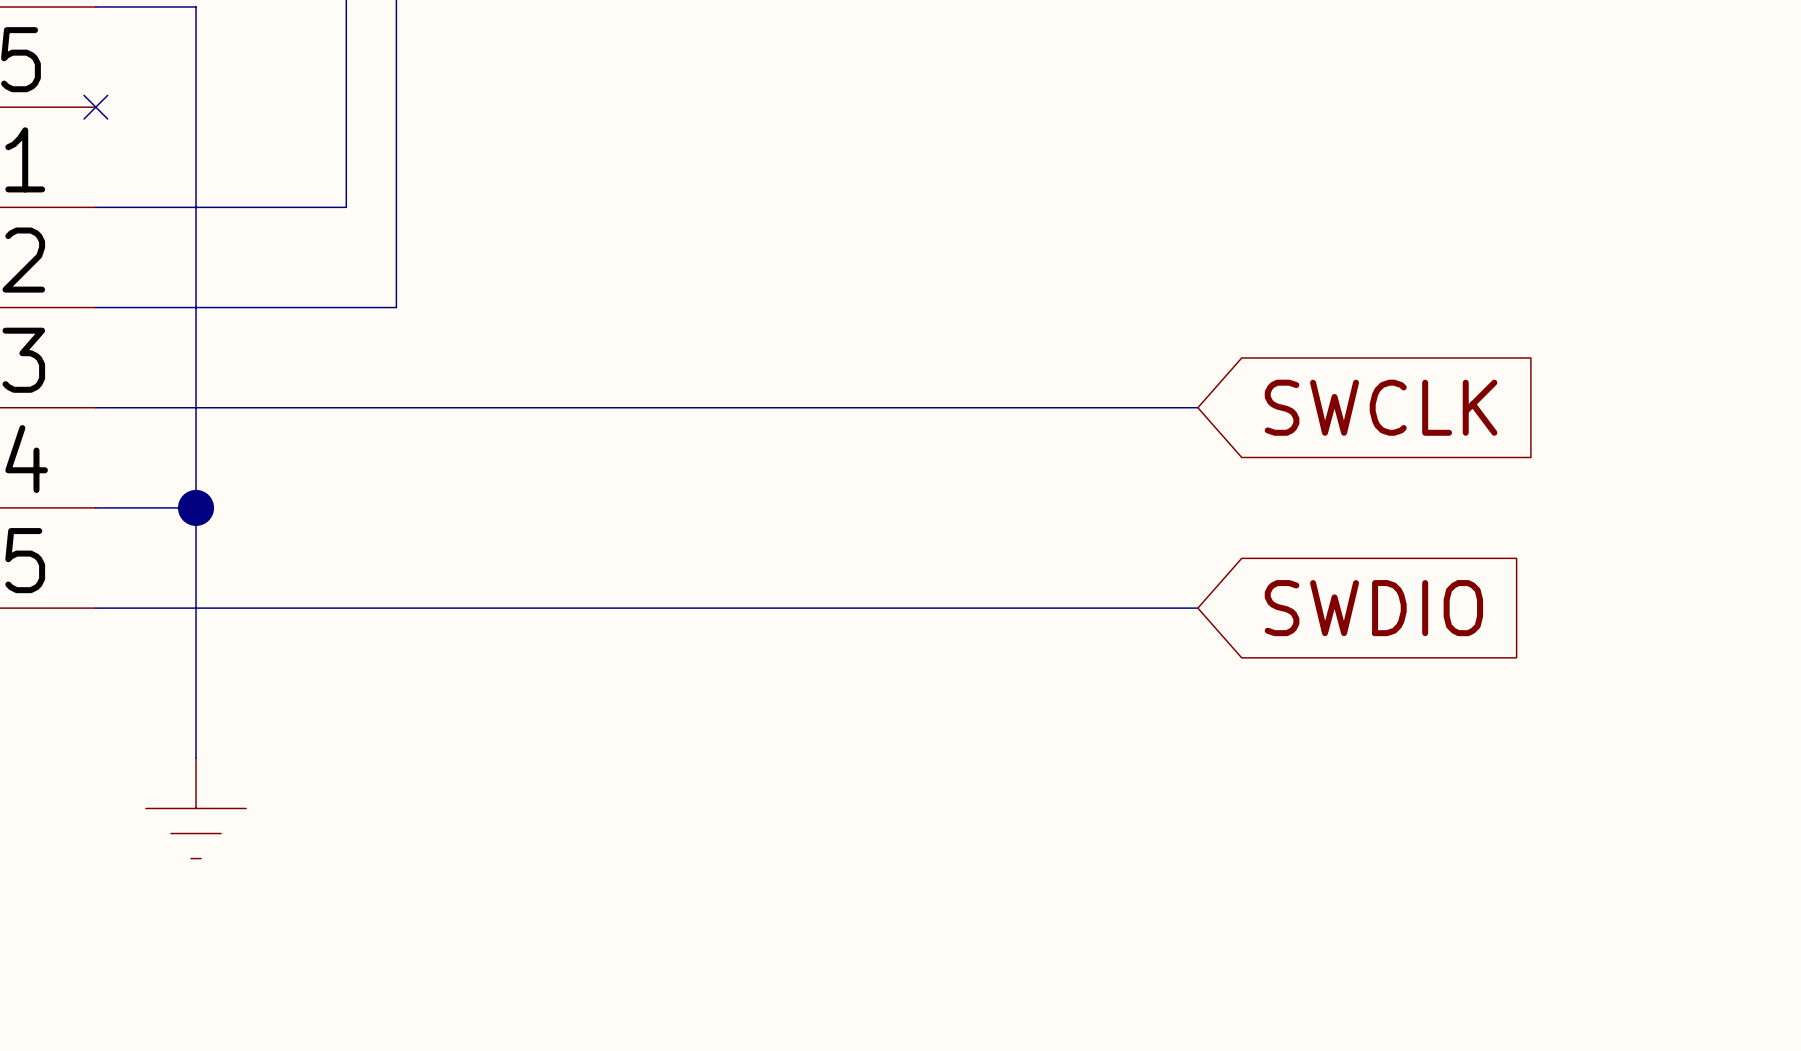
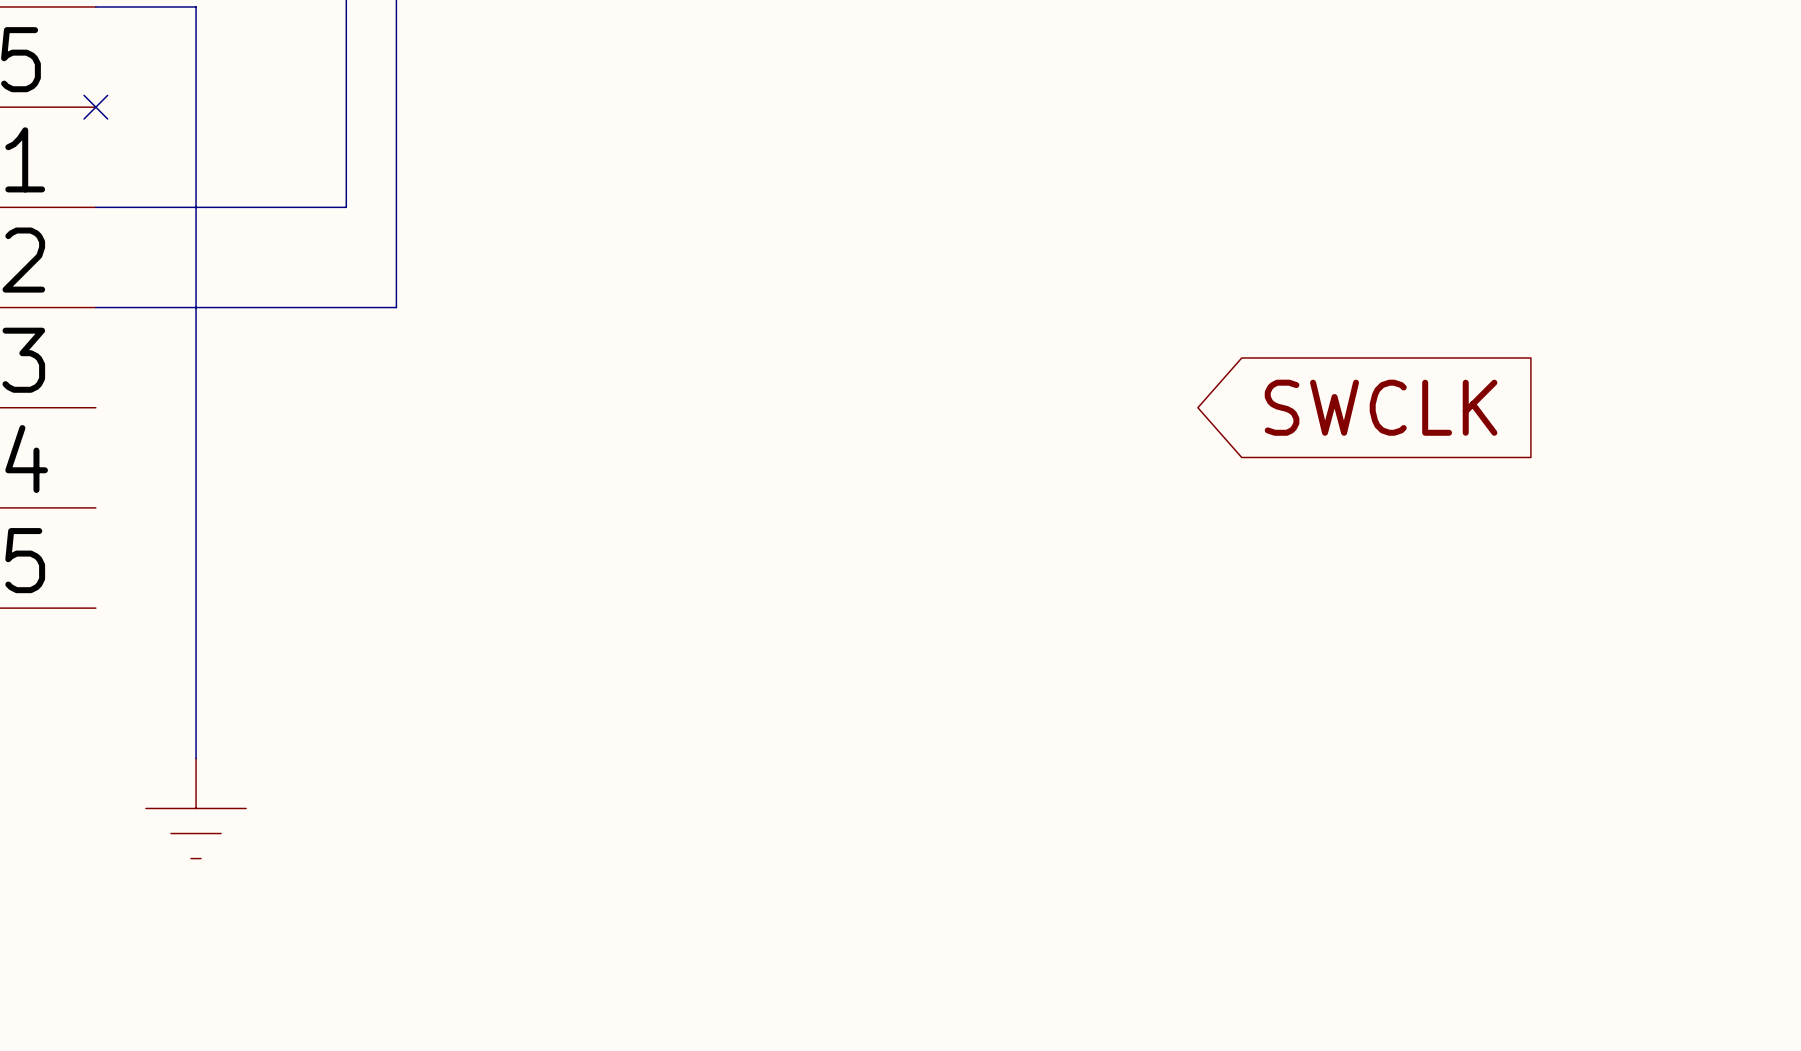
wire: (95, 407) (1197, 407) -> none
wire: (95, 507) (196, 507) -> none
junction: (196, 507) -> none
wire: (95, 608) (1197, 608) -> none
global label: SWDIO (1373, 608) -> none

